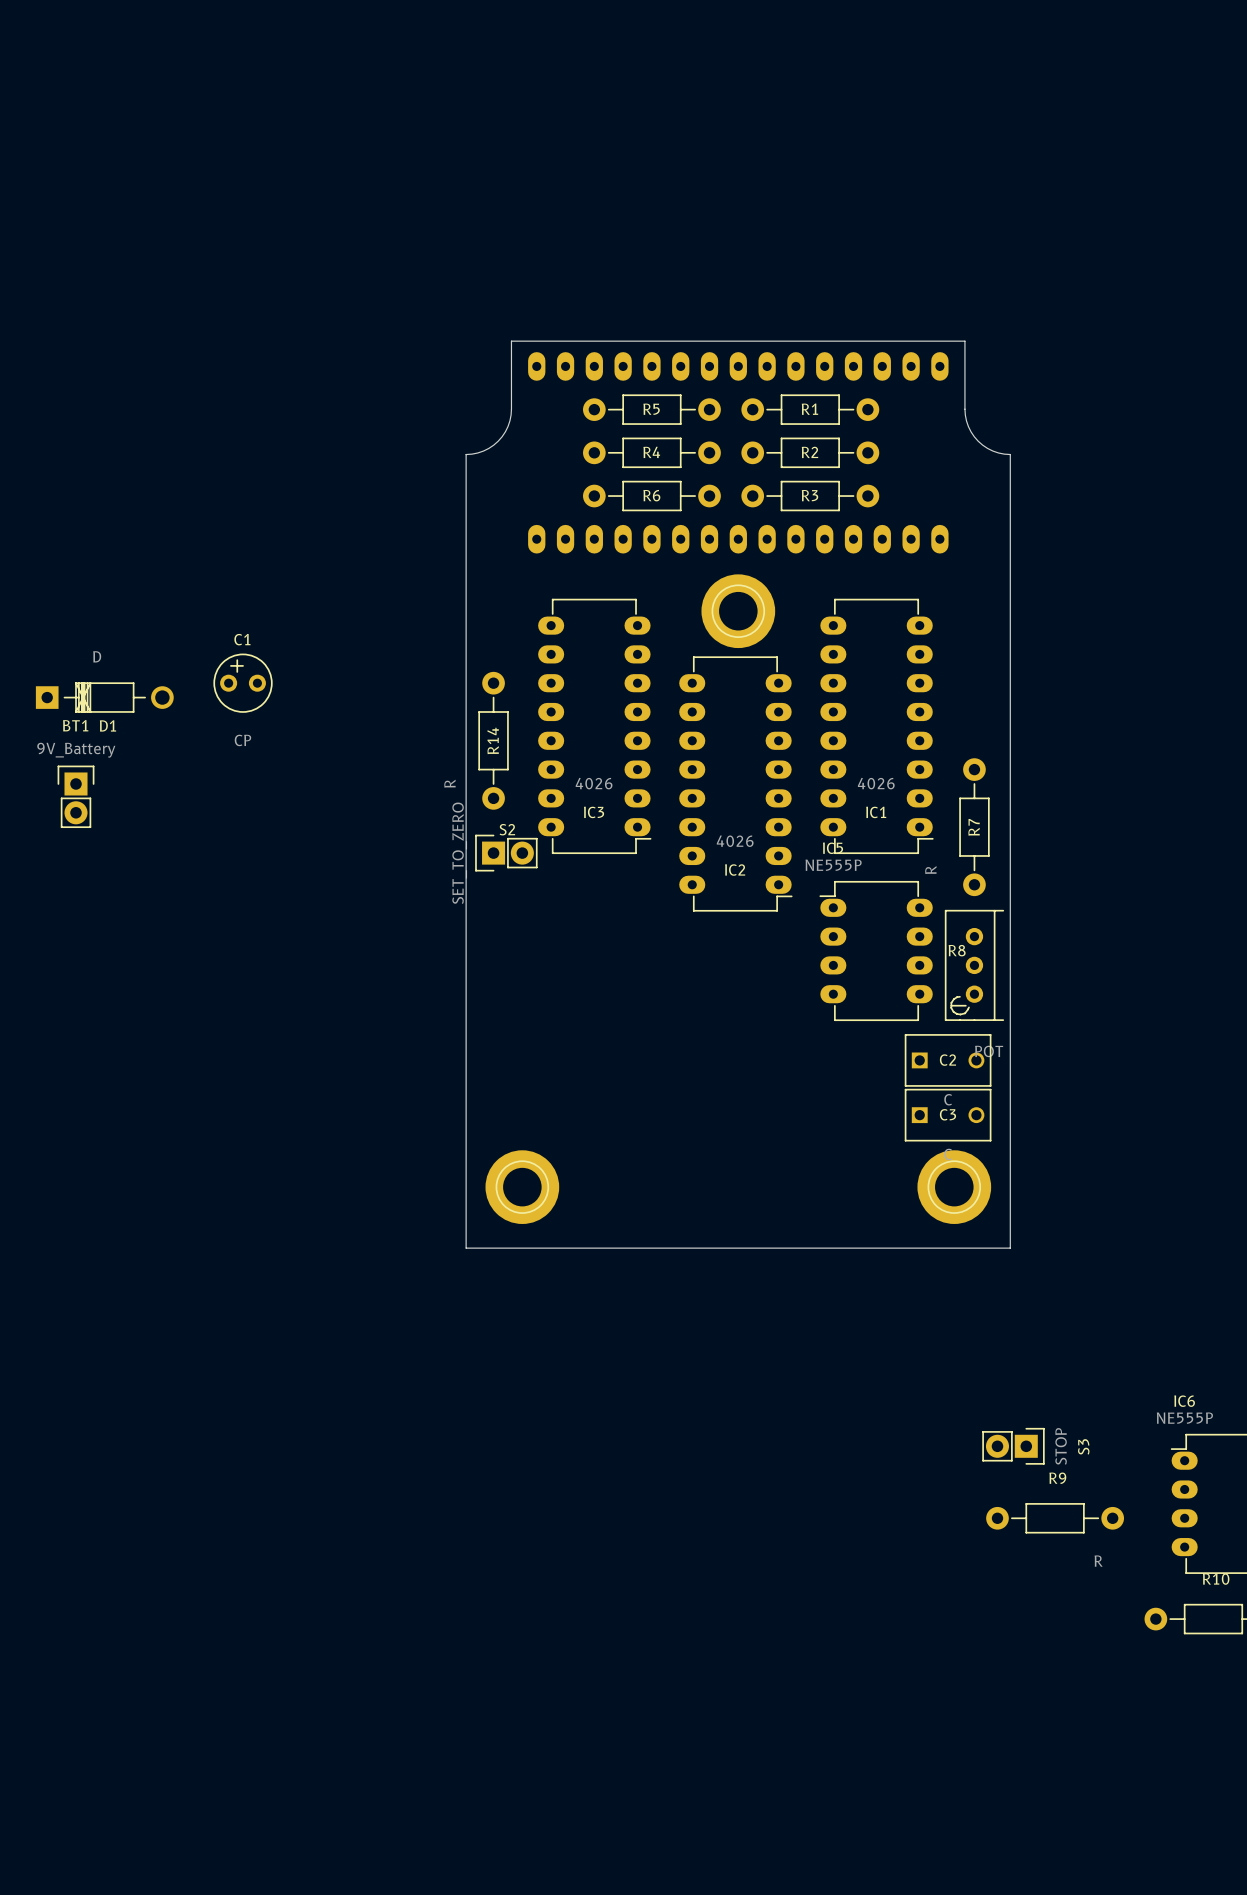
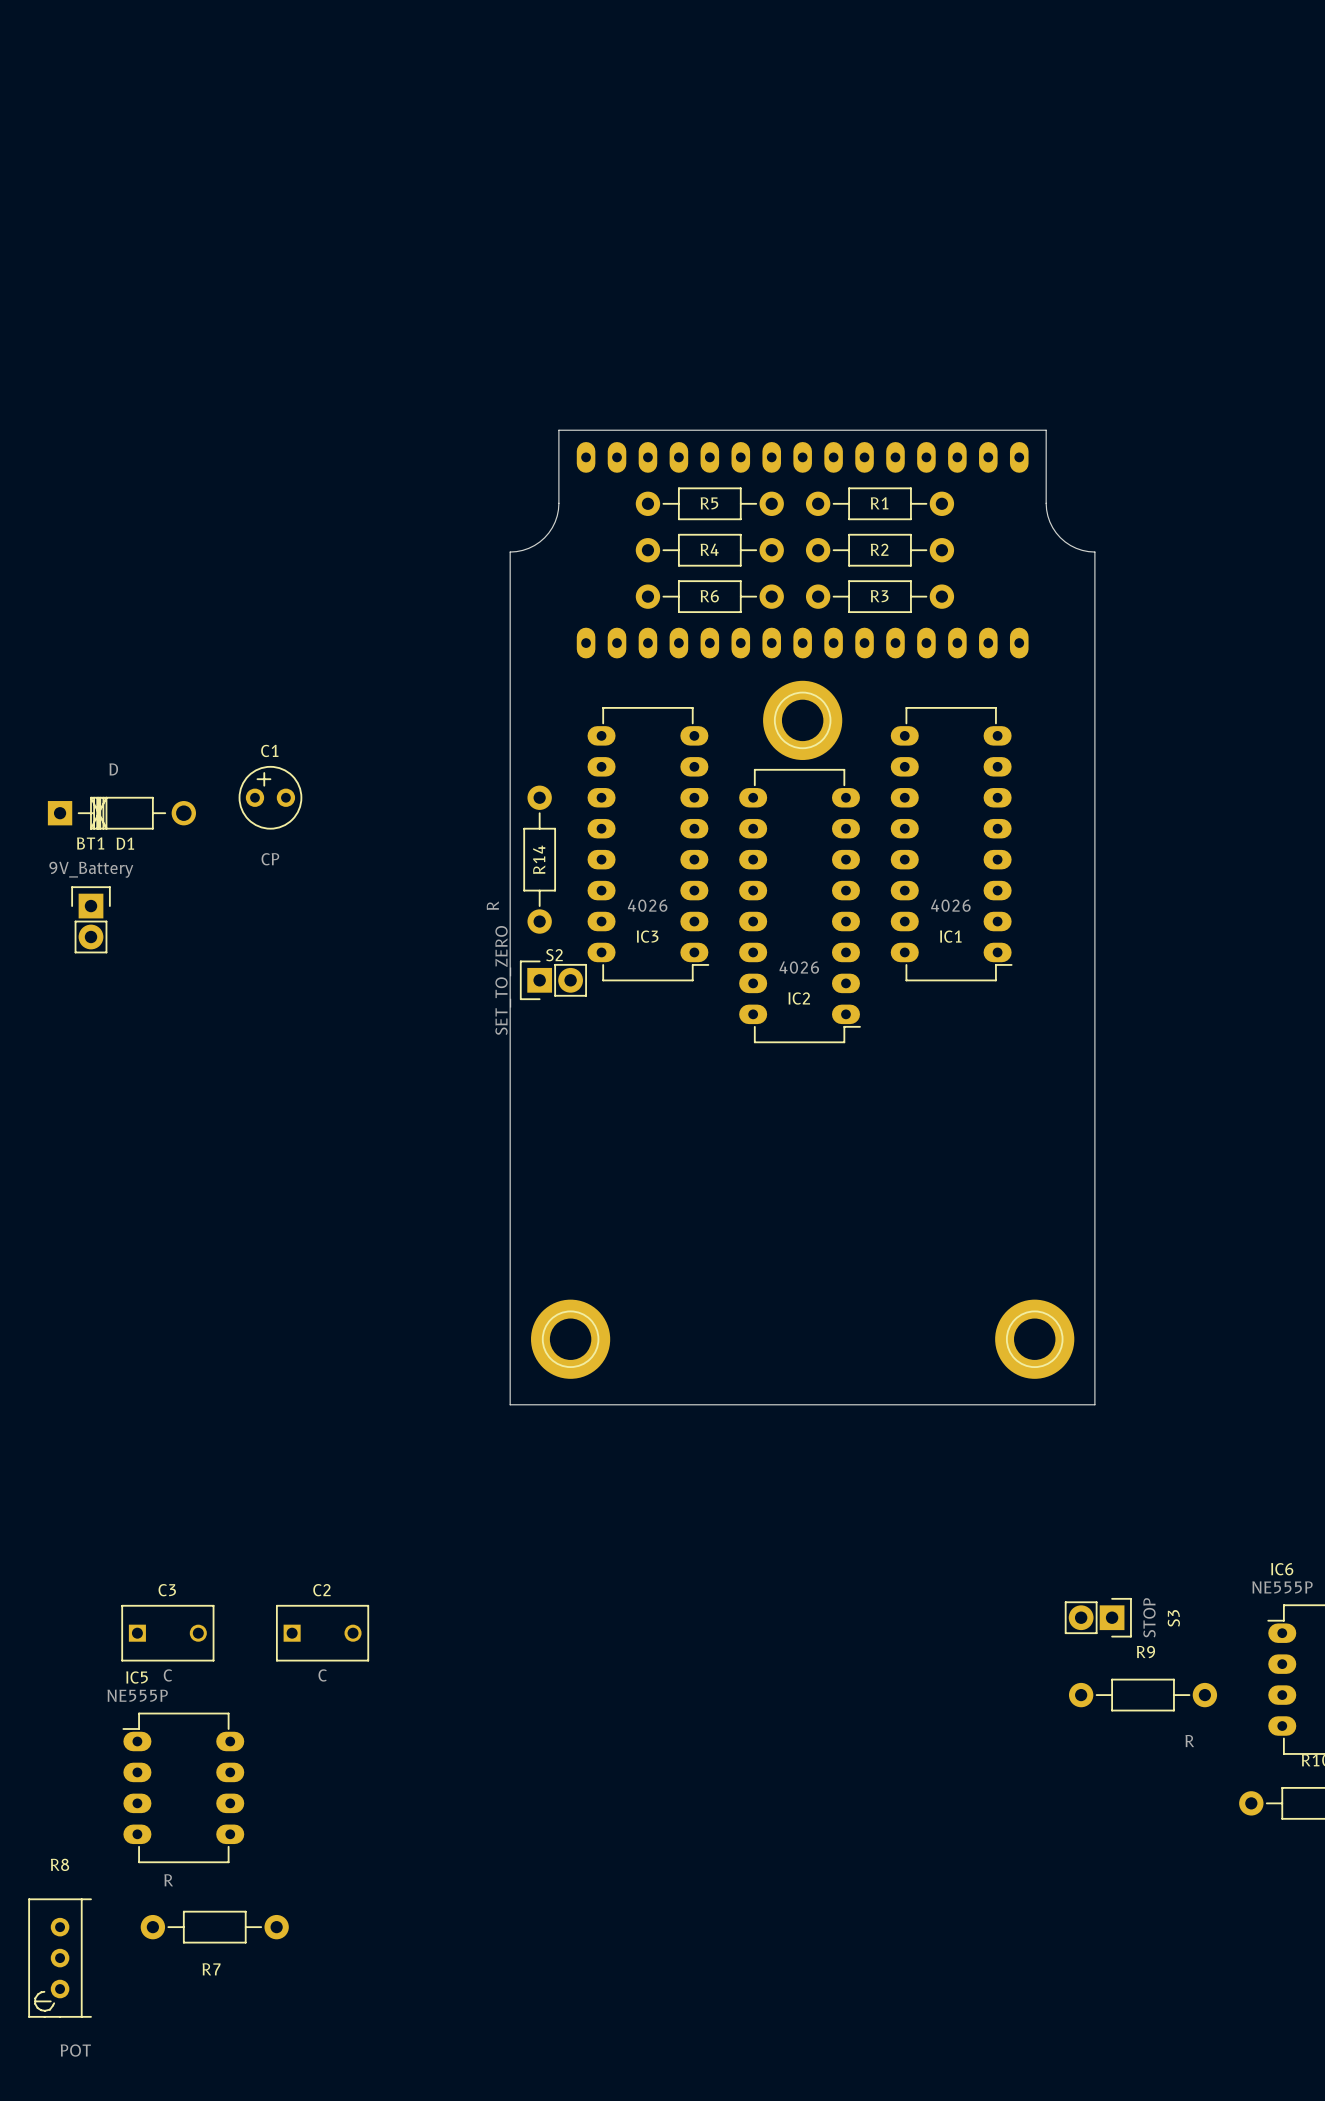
R7 rotation: 0° (974, 827) -> 90° clockwise (214, 1927)
R7 position: (974, 827) -> (214, 1927)
R7 name position: R7 (974, 827) -> R7 (211, 1969)
R8 name position: R8 (957, 950) -> R8 (60, 1864)
IC5 position: (876, 951) -> (183, 1787)
R8 position: (974, 965) -> (60, 1958)
C2 name position: C2 (947, 1060) -> C2 (321, 1590)
C2 position: (948, 1060) -> (322, 1633)
C3 name position: C3 (947, 1114) -> C3 (167, 1590)
C3 position: (948, 1115) -> (167, 1633)

